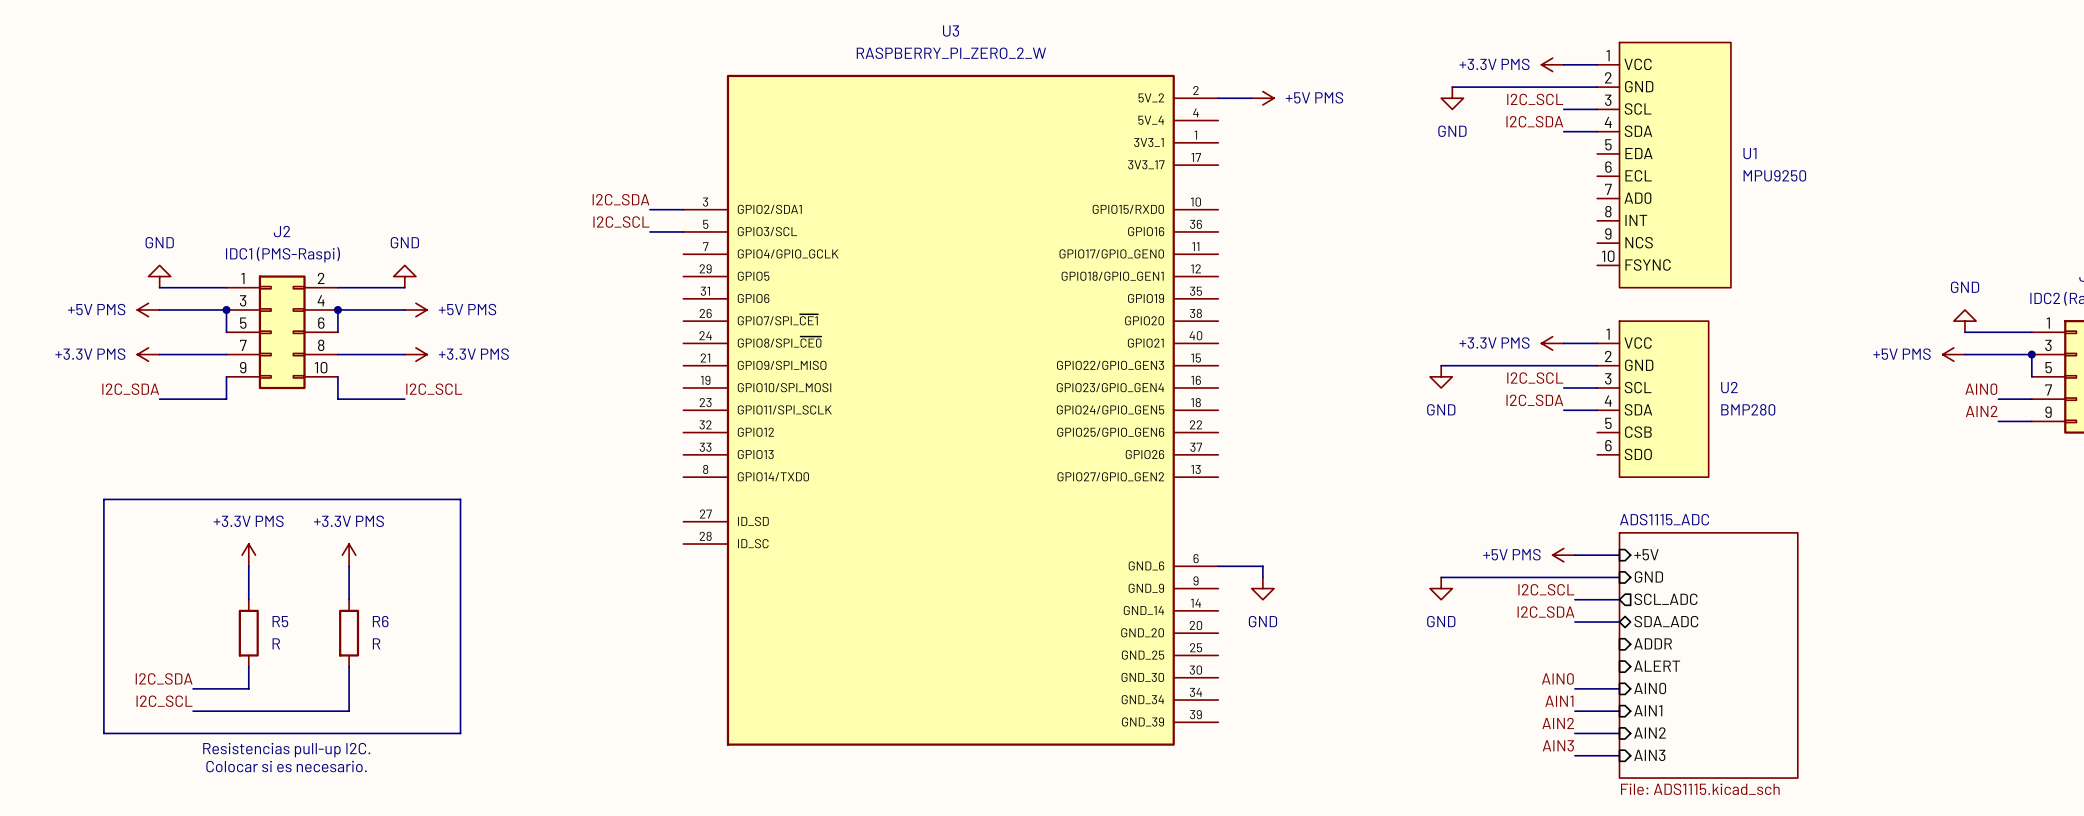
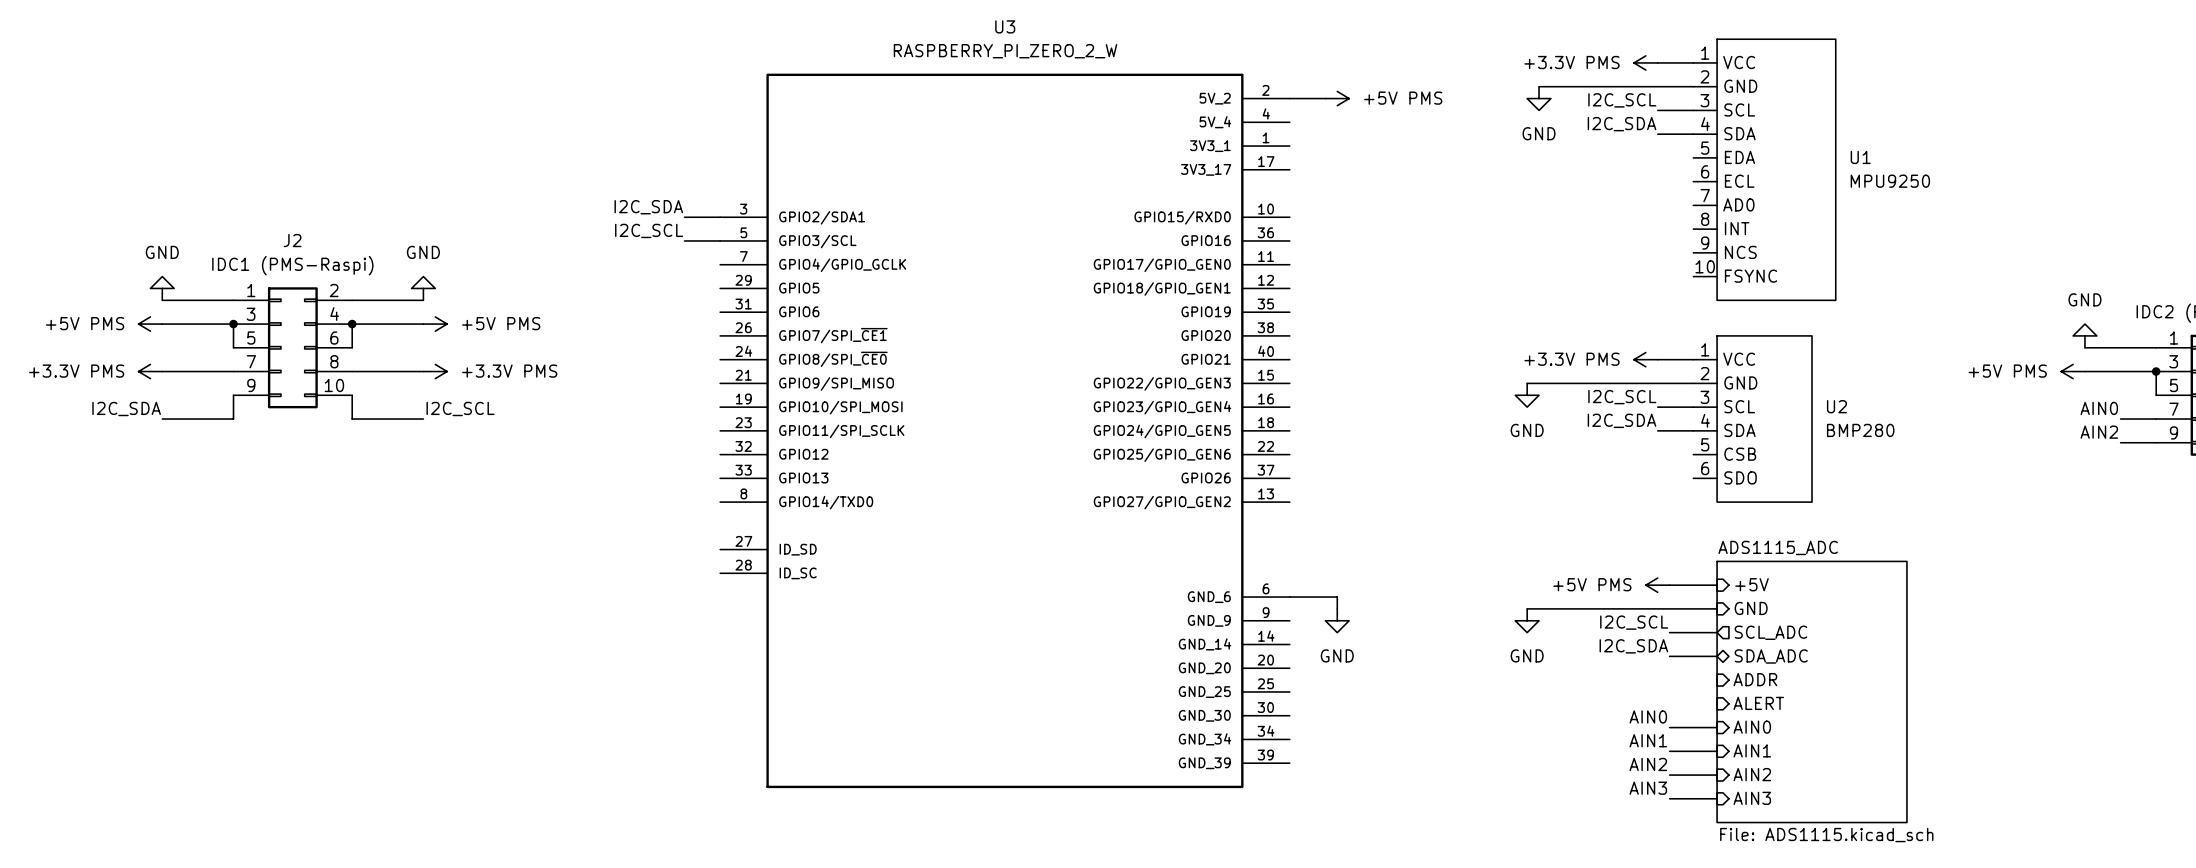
line: (103, 499) (460, 499) (460, 733) (103, 733) (103, 499) -> none
power symbol: +3.3V PMS (248, 555) -> none
power symbol: +3.3V PMS (349, 555) -> none
wire: (248, 566) (248, 599) -> none
wire: (349, 566) (349, 599) -> none
R5: R (248, 633) -> none
R6: R (349, 633) -> none
wire: (248, 666) (248, 688) (193, 688) -> none
wire: (349, 666) (349, 711) (193, 711) -> none
label: I2C_SDA (164, 678) -> none
label: I2C_SCL (164, 701) -> none
text: Resistencias pull-up I2C. (286, 750) -> none
text: Colocar si es necesario. (286, 766) -> none

